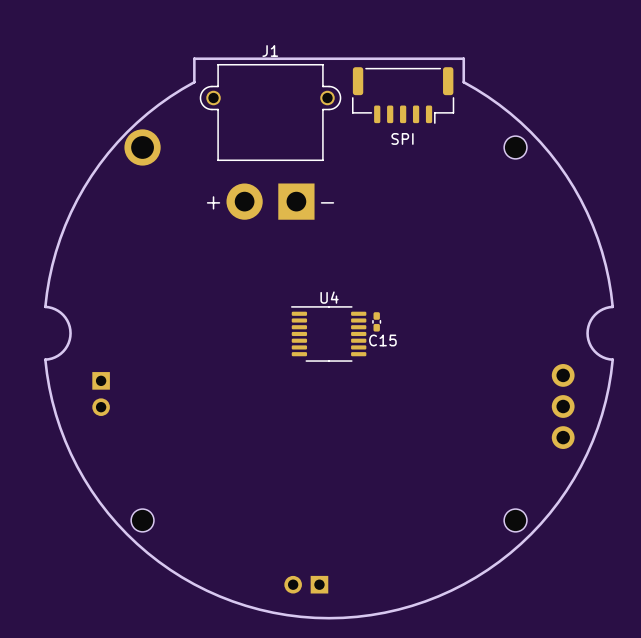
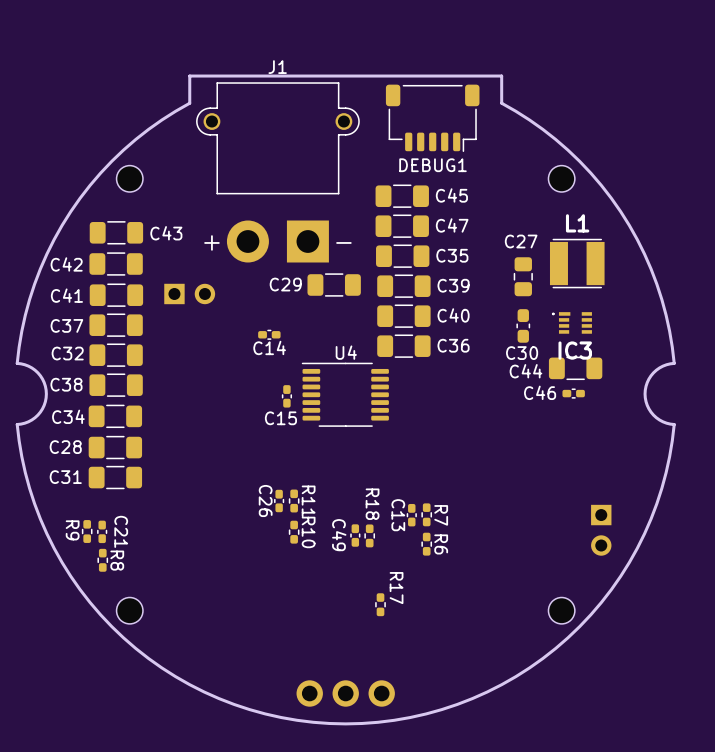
part: (403, 95) -> none
DEBUG1: none -> (432, 118)
part footprint: [124, 129, 161, 166] -> [116, 165, 143, 193]
text: SPI (402, 138) -> none
C45: none -> (402, 196)
C47: none -> (402, 226)
C43: none -> (116, 232)
C35: none -> (402, 256)
L1: none -> (577, 263)
C42: none -> (116, 263)
C27: none -> (523, 276)
C29: none -> (334, 284)
C39: none -> (403, 286)
C41: none -> (116, 295)
C40: none -> (403, 316)
IC3: none -> (572, 322)
C37: none -> (116, 325)
C30: none -> (523, 325)
C14: none -> (269, 334)
C36: none -> (403, 346)
C32: none -> (116, 355)
C44: none -> (575, 368)
C15 position: (376, 321) -> (286, 396)
C38: none -> (116, 385)
C46: none -> (573, 393)
C15 name position: C15 (382, 340) -> C15 (280, 418)
C34: none -> (115, 416)
C28: none -> (115, 447)
part rotation: 0° (101, 394) -> 90° counterclockwise (189, 293)
part position: (101, 394) -> (189, 293)
C31: none -> (115, 477)
part: (563, 406) -> none
C26: none -> (279, 501)
R11: none -> (294, 501)
C13: none -> (411, 515)
R7: none -> (426, 514)
part: none -> (601, 530)
R9: none -> (87, 531)
C21: none -> (102, 531)
R10: none -> (294, 532)
C49: none -> (355, 535)
R18: none -> (369, 535)
R6: none -> (426, 544)
R8: none -> (102, 560)
R17: none -> (380, 604)
part: (306, 584) -> none
part: none -> (345, 693)

